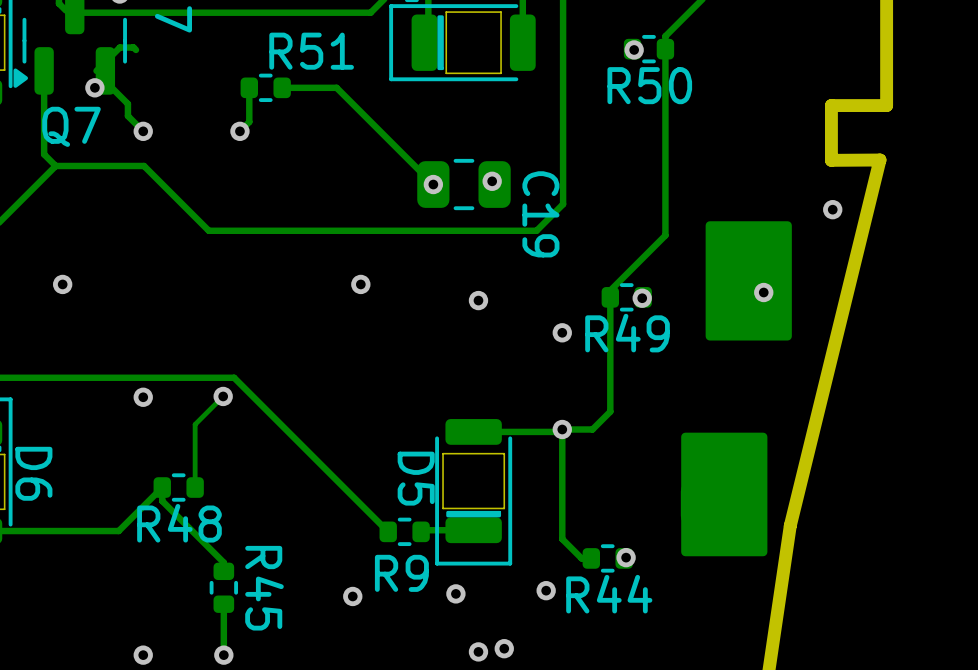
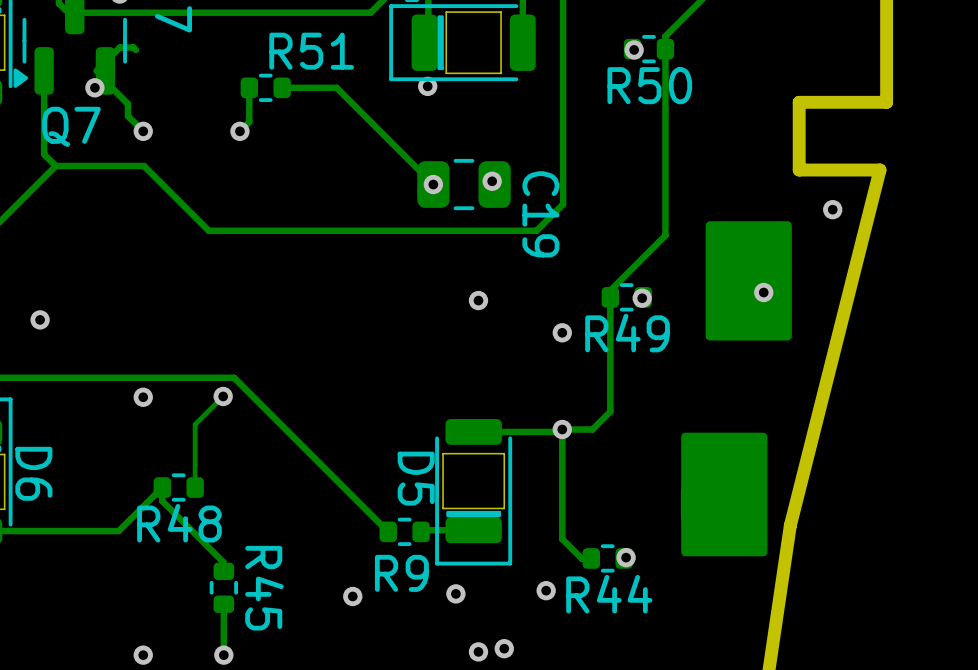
via: none -> (427, 86)
board edge: (886, 102) (886, 105) (831, 105) (831, 160) (879, 160) (790, 525) -> (886, 102) (799, 102) (799, 170) (879, 170) (790, 525)
via position: (62, 284) -> (40, 319)
via: (360, 284) -> none

